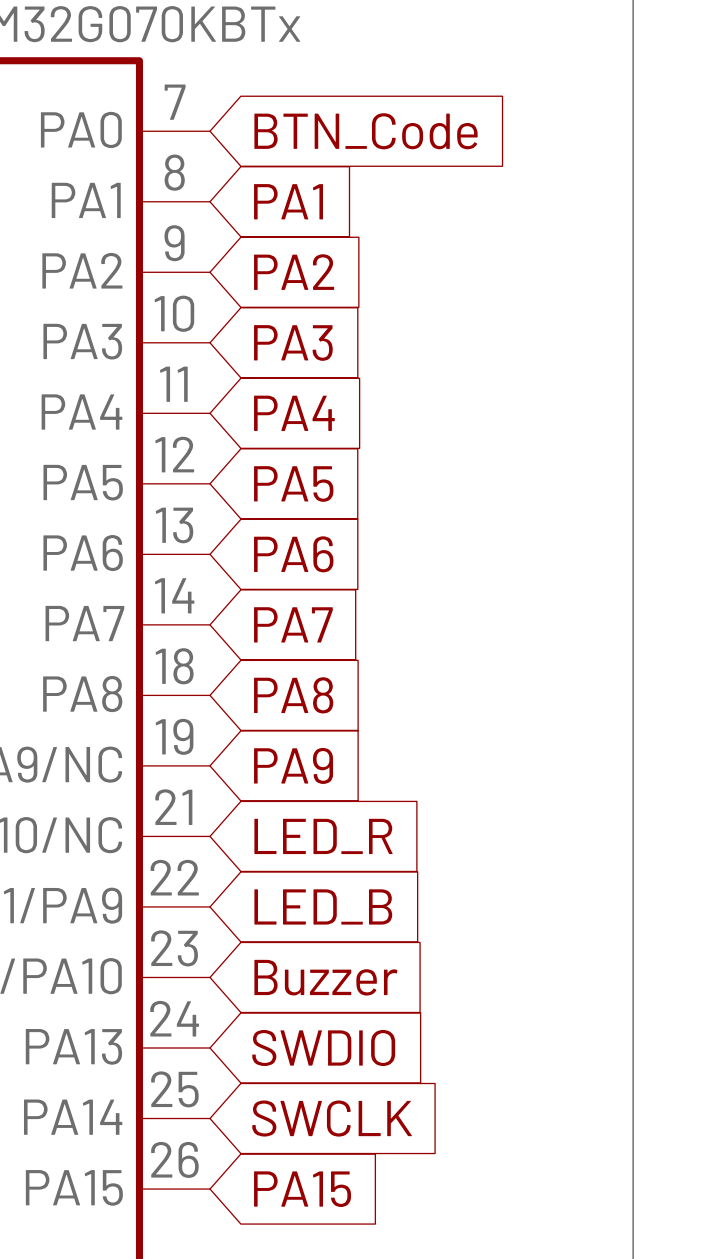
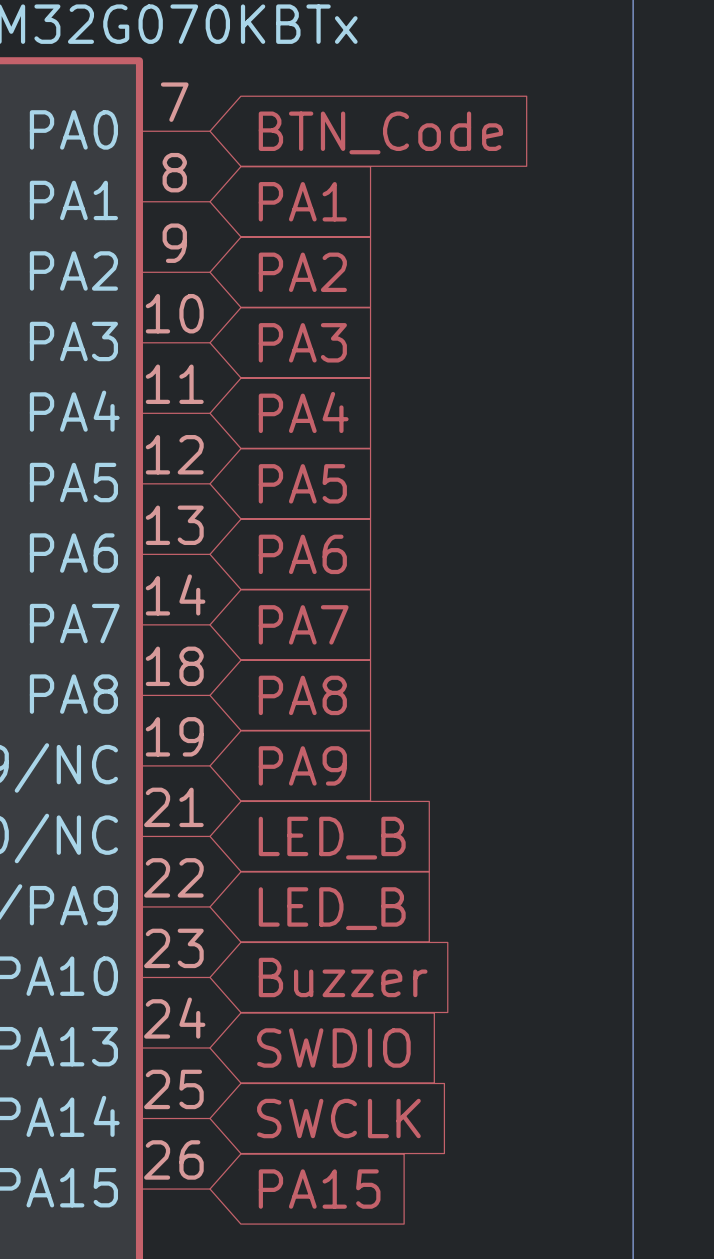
global label: LED_R (323, 836) -> LED_B (332, 838)

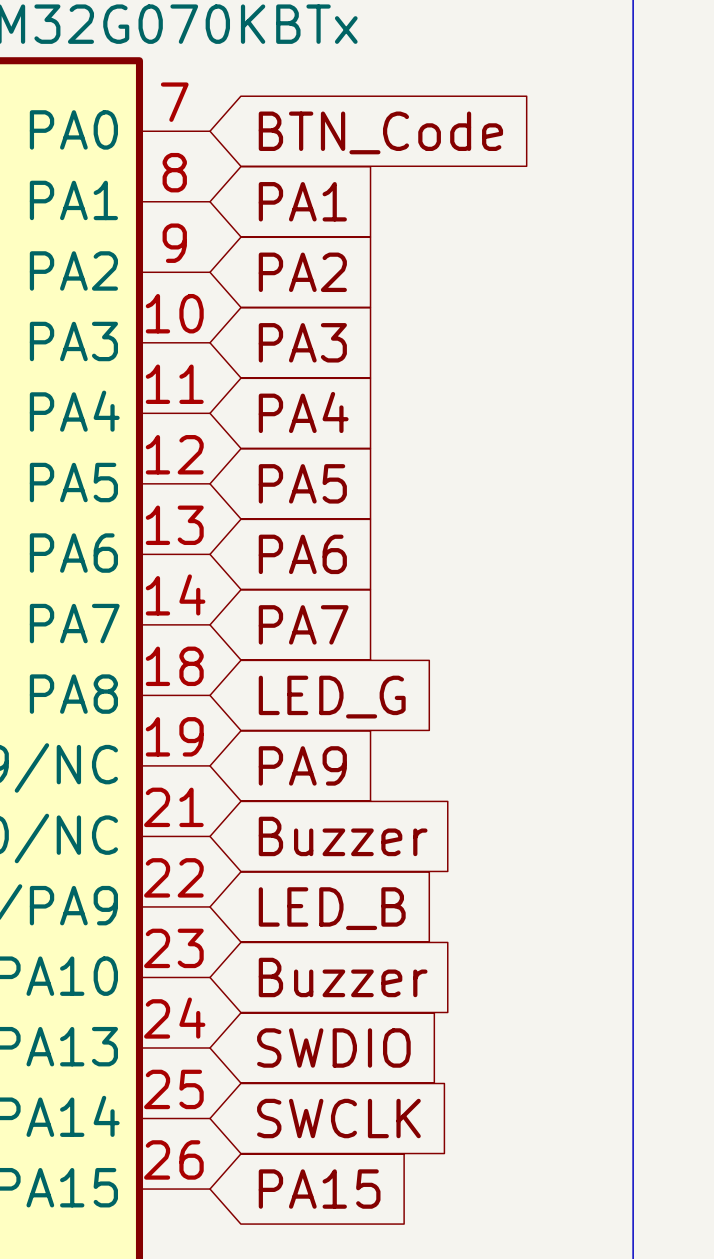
global label: PA8 (302, 695) -> LED_G (332, 697)
global label: LED_B (332, 838) -> Buzzer (343, 836)

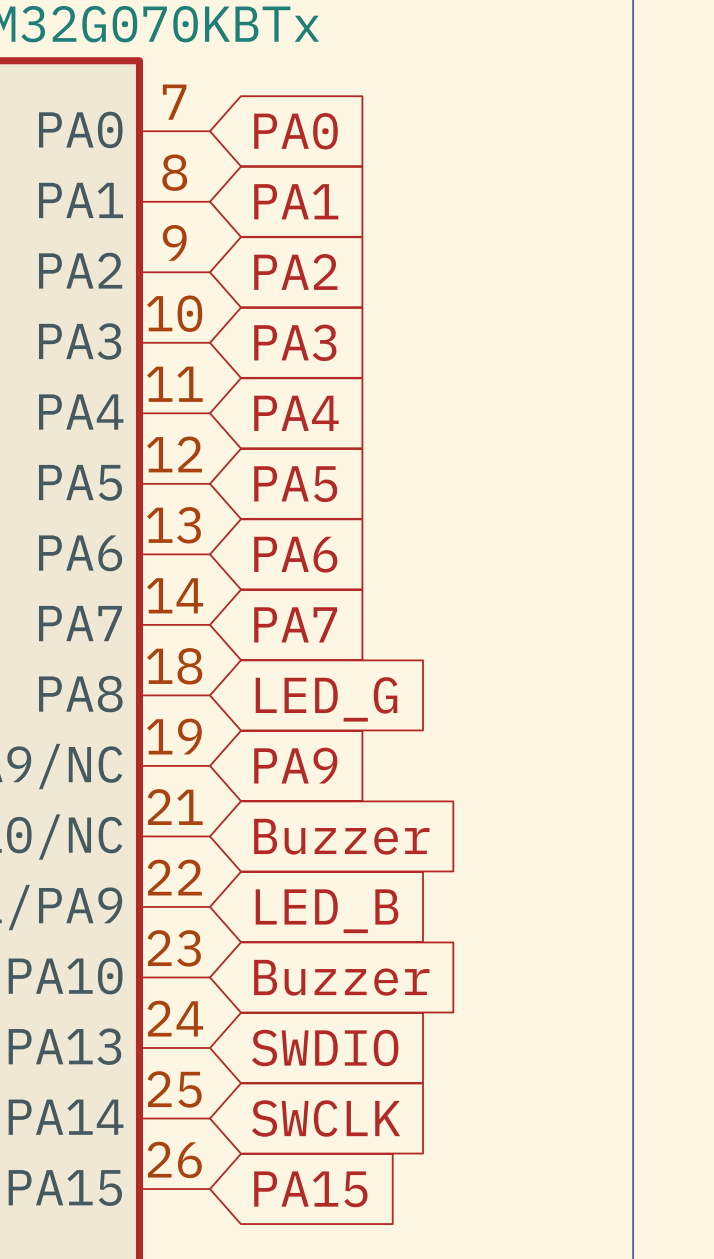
global label: BTN_Code (380, 132) -> PA0 (295, 131)

